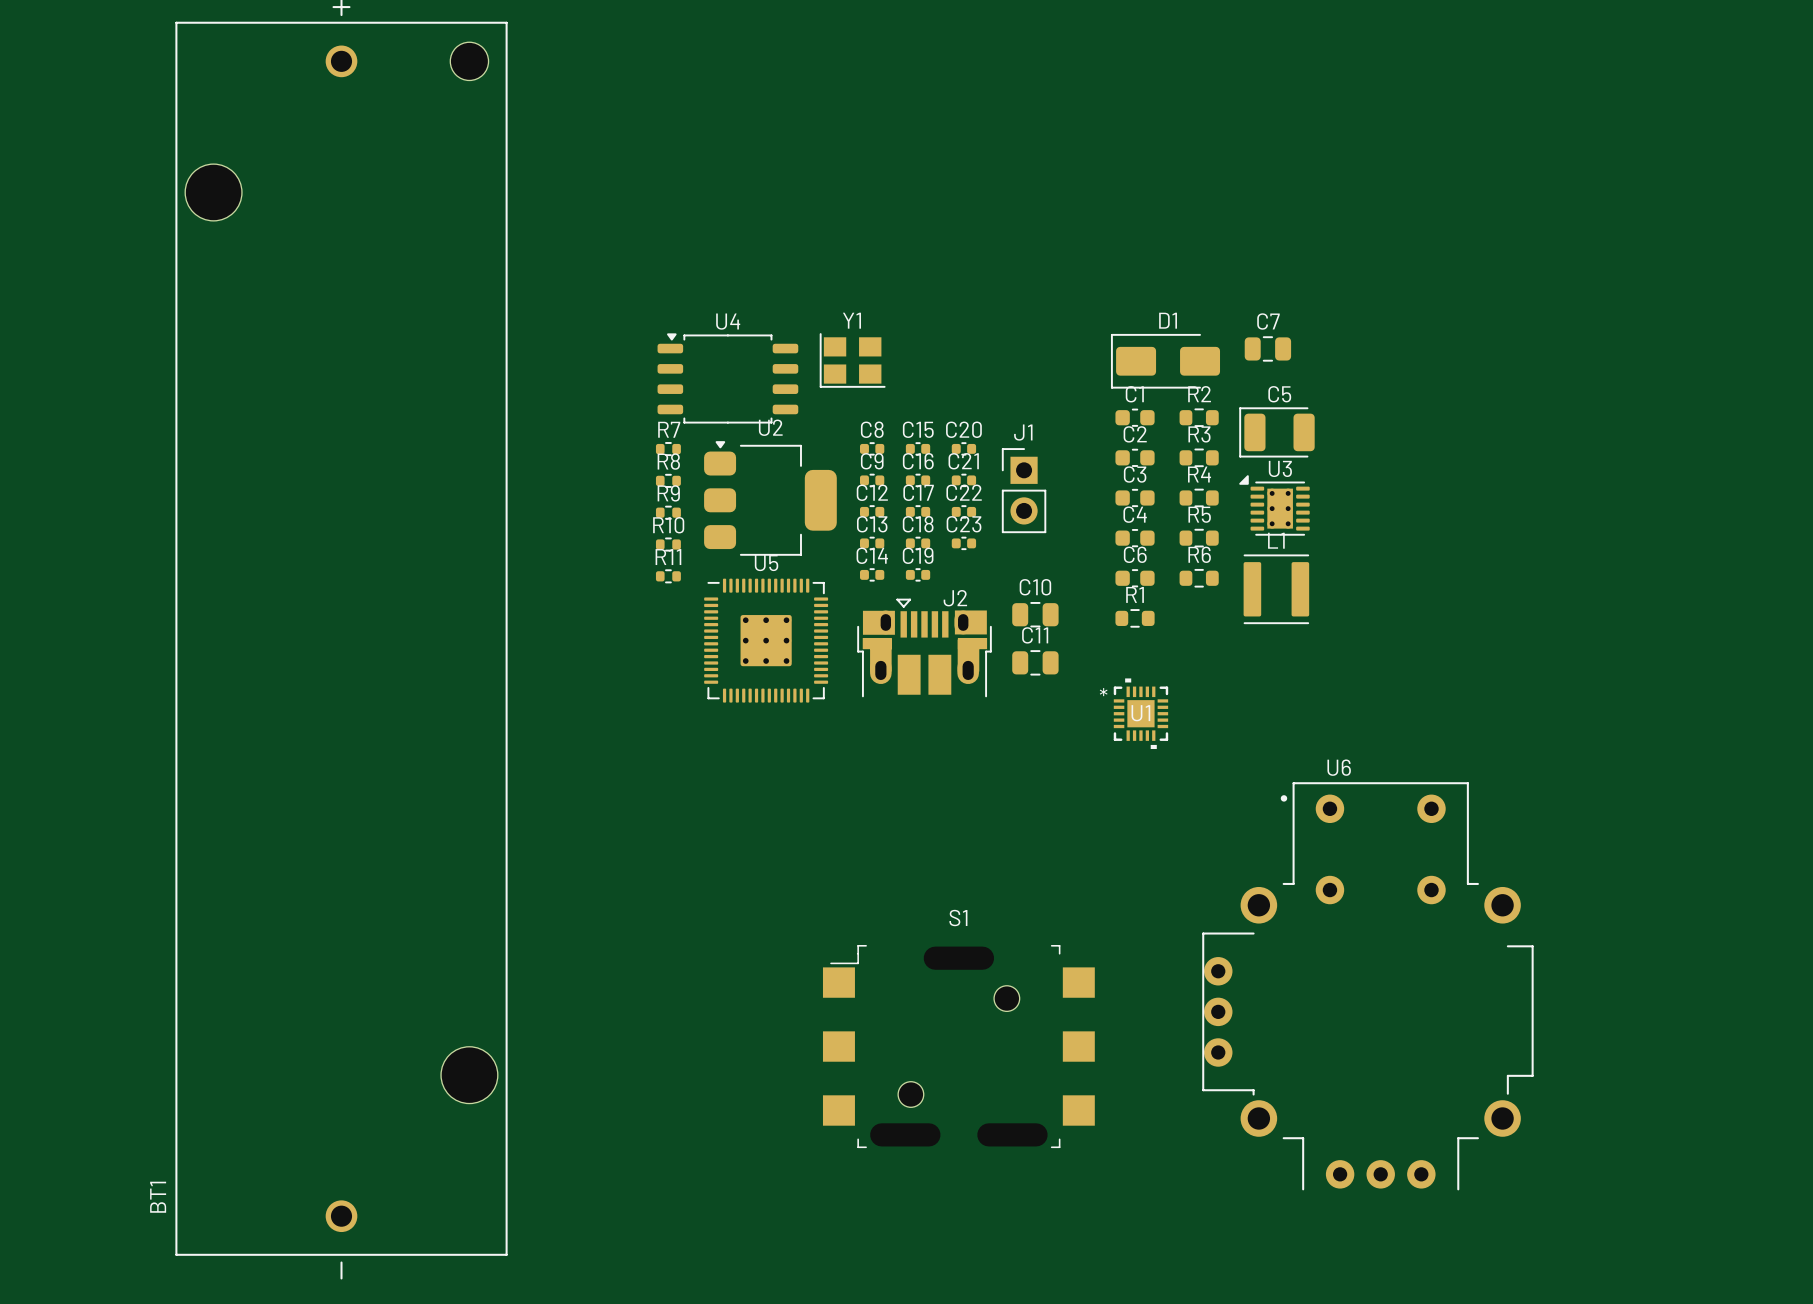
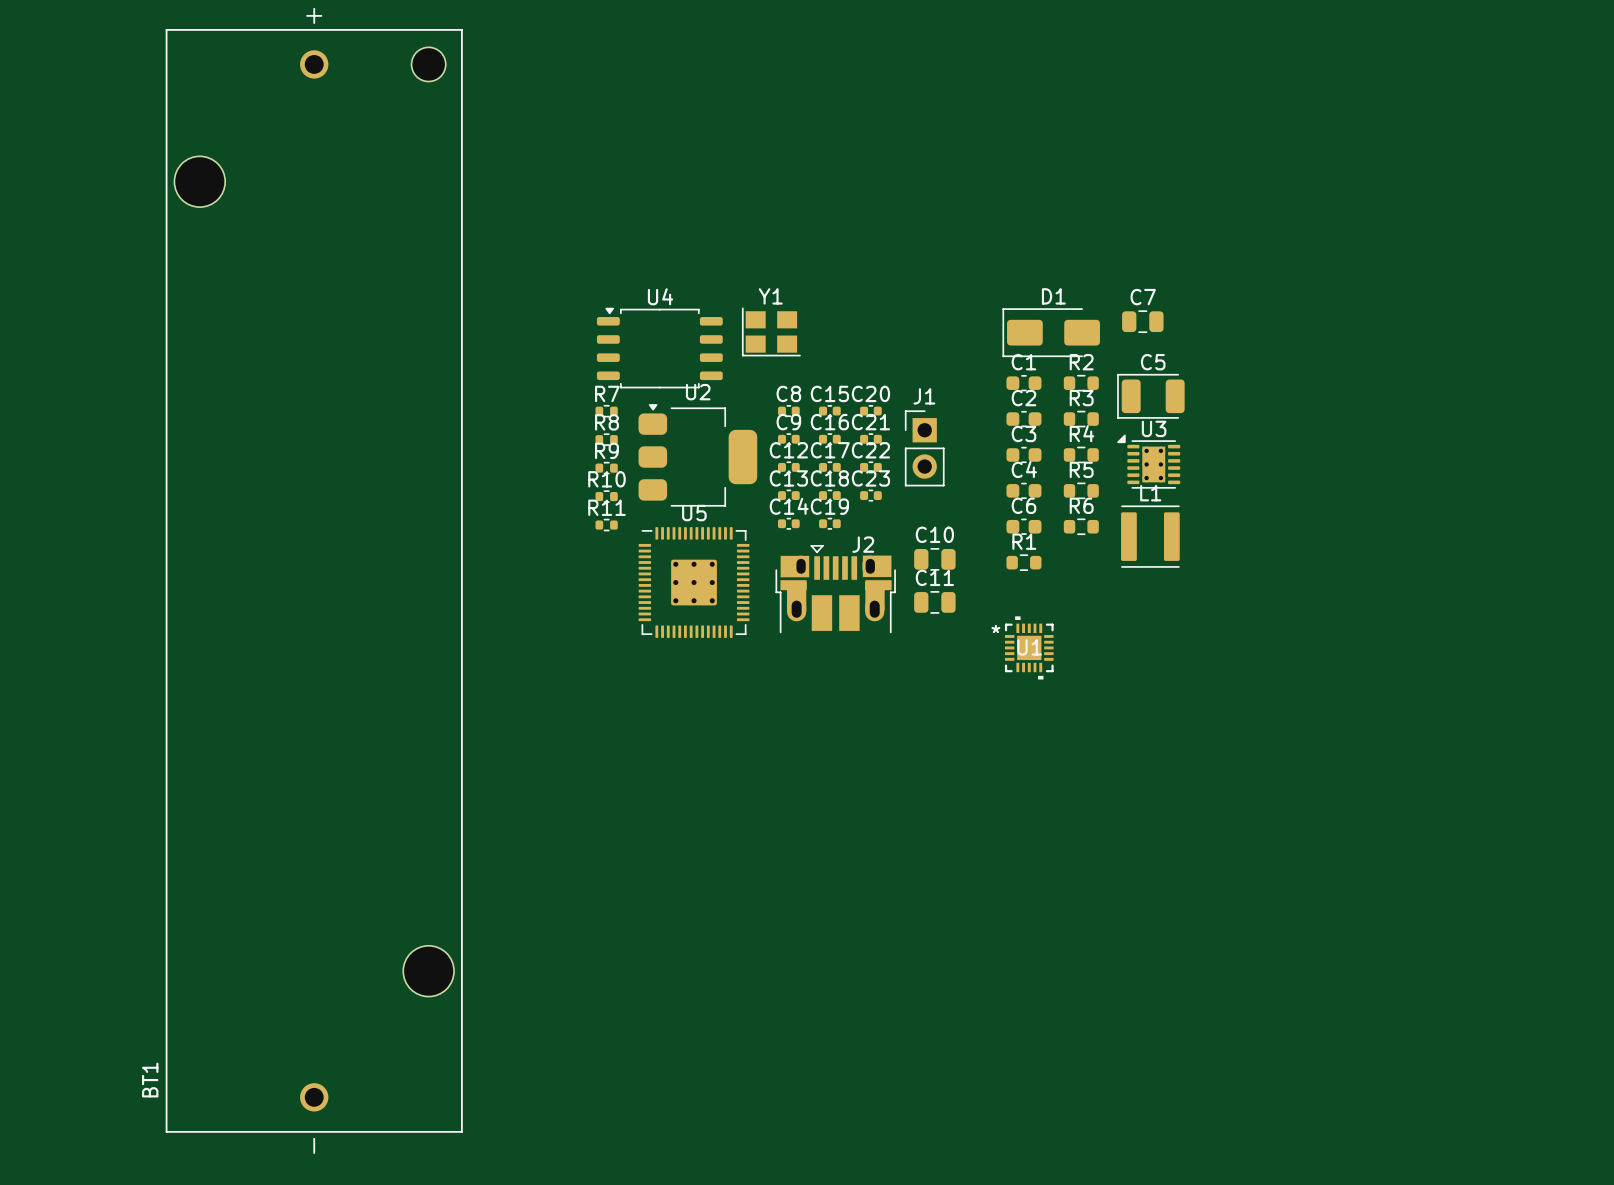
U6: (1367, 986) -> none
S1: (958, 1046) -> none

